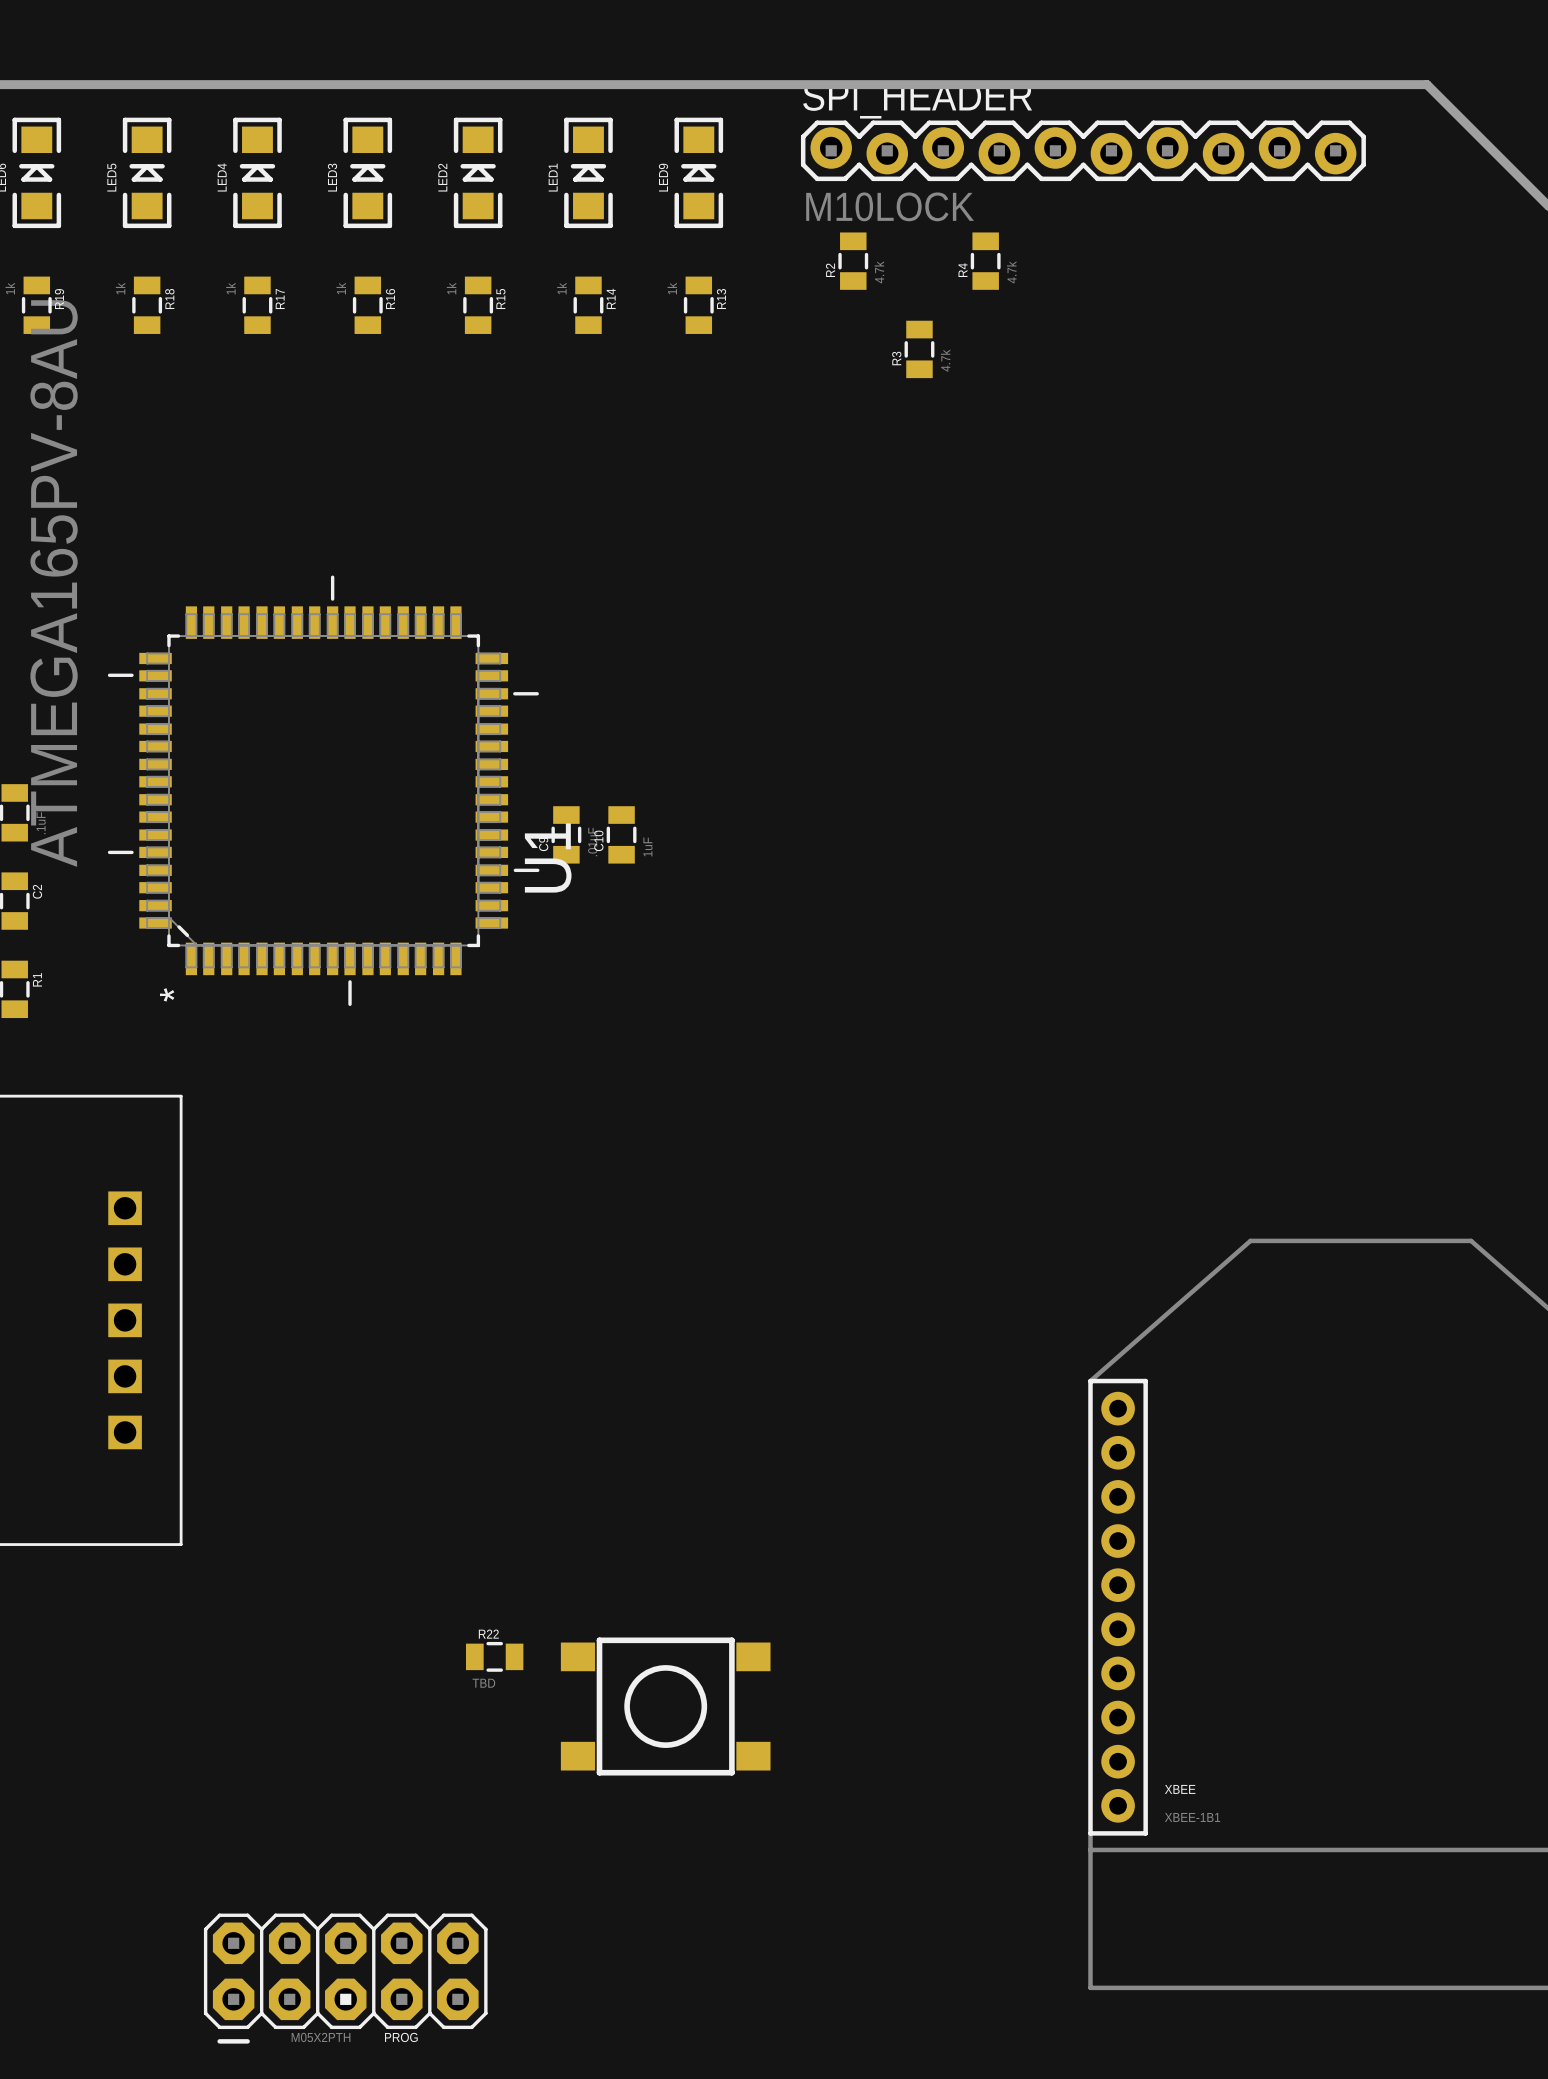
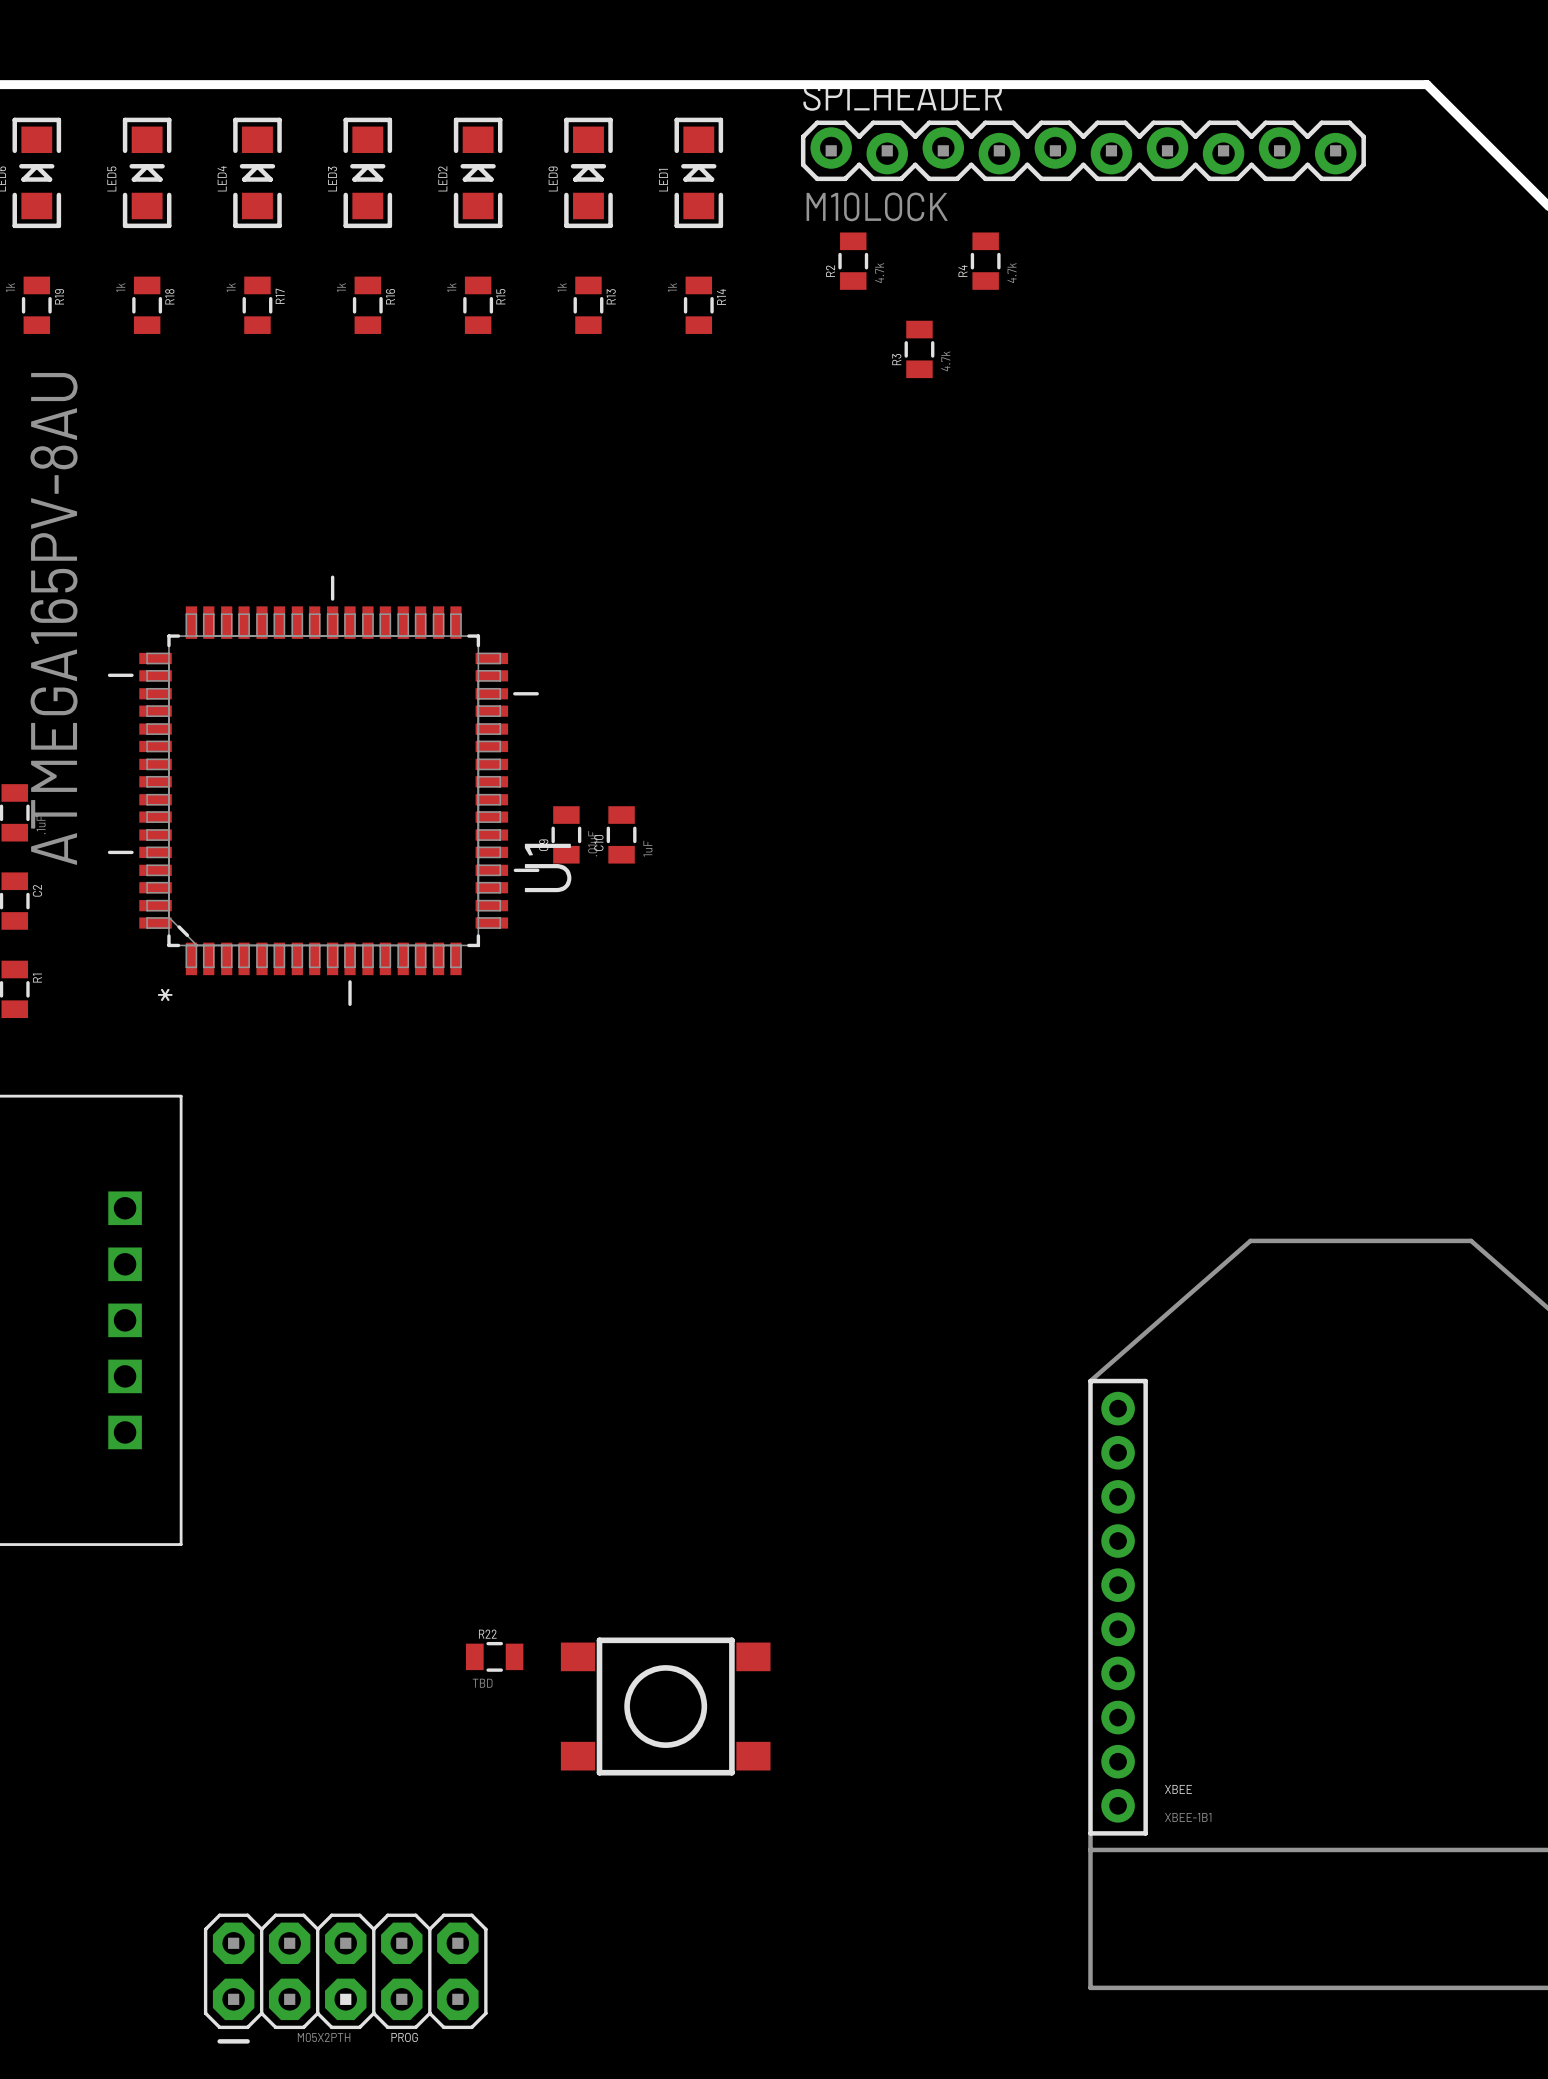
LED1 name: LED1 (553, 177) -> LED9 (553, 179)
LED9 name: LED9 (663, 177) -> LED1 (663, 180)
R14 name: R14 (611, 298) -> R13 (611, 296)
R13 name: R13 (721, 299) -> R14 (721, 297)

